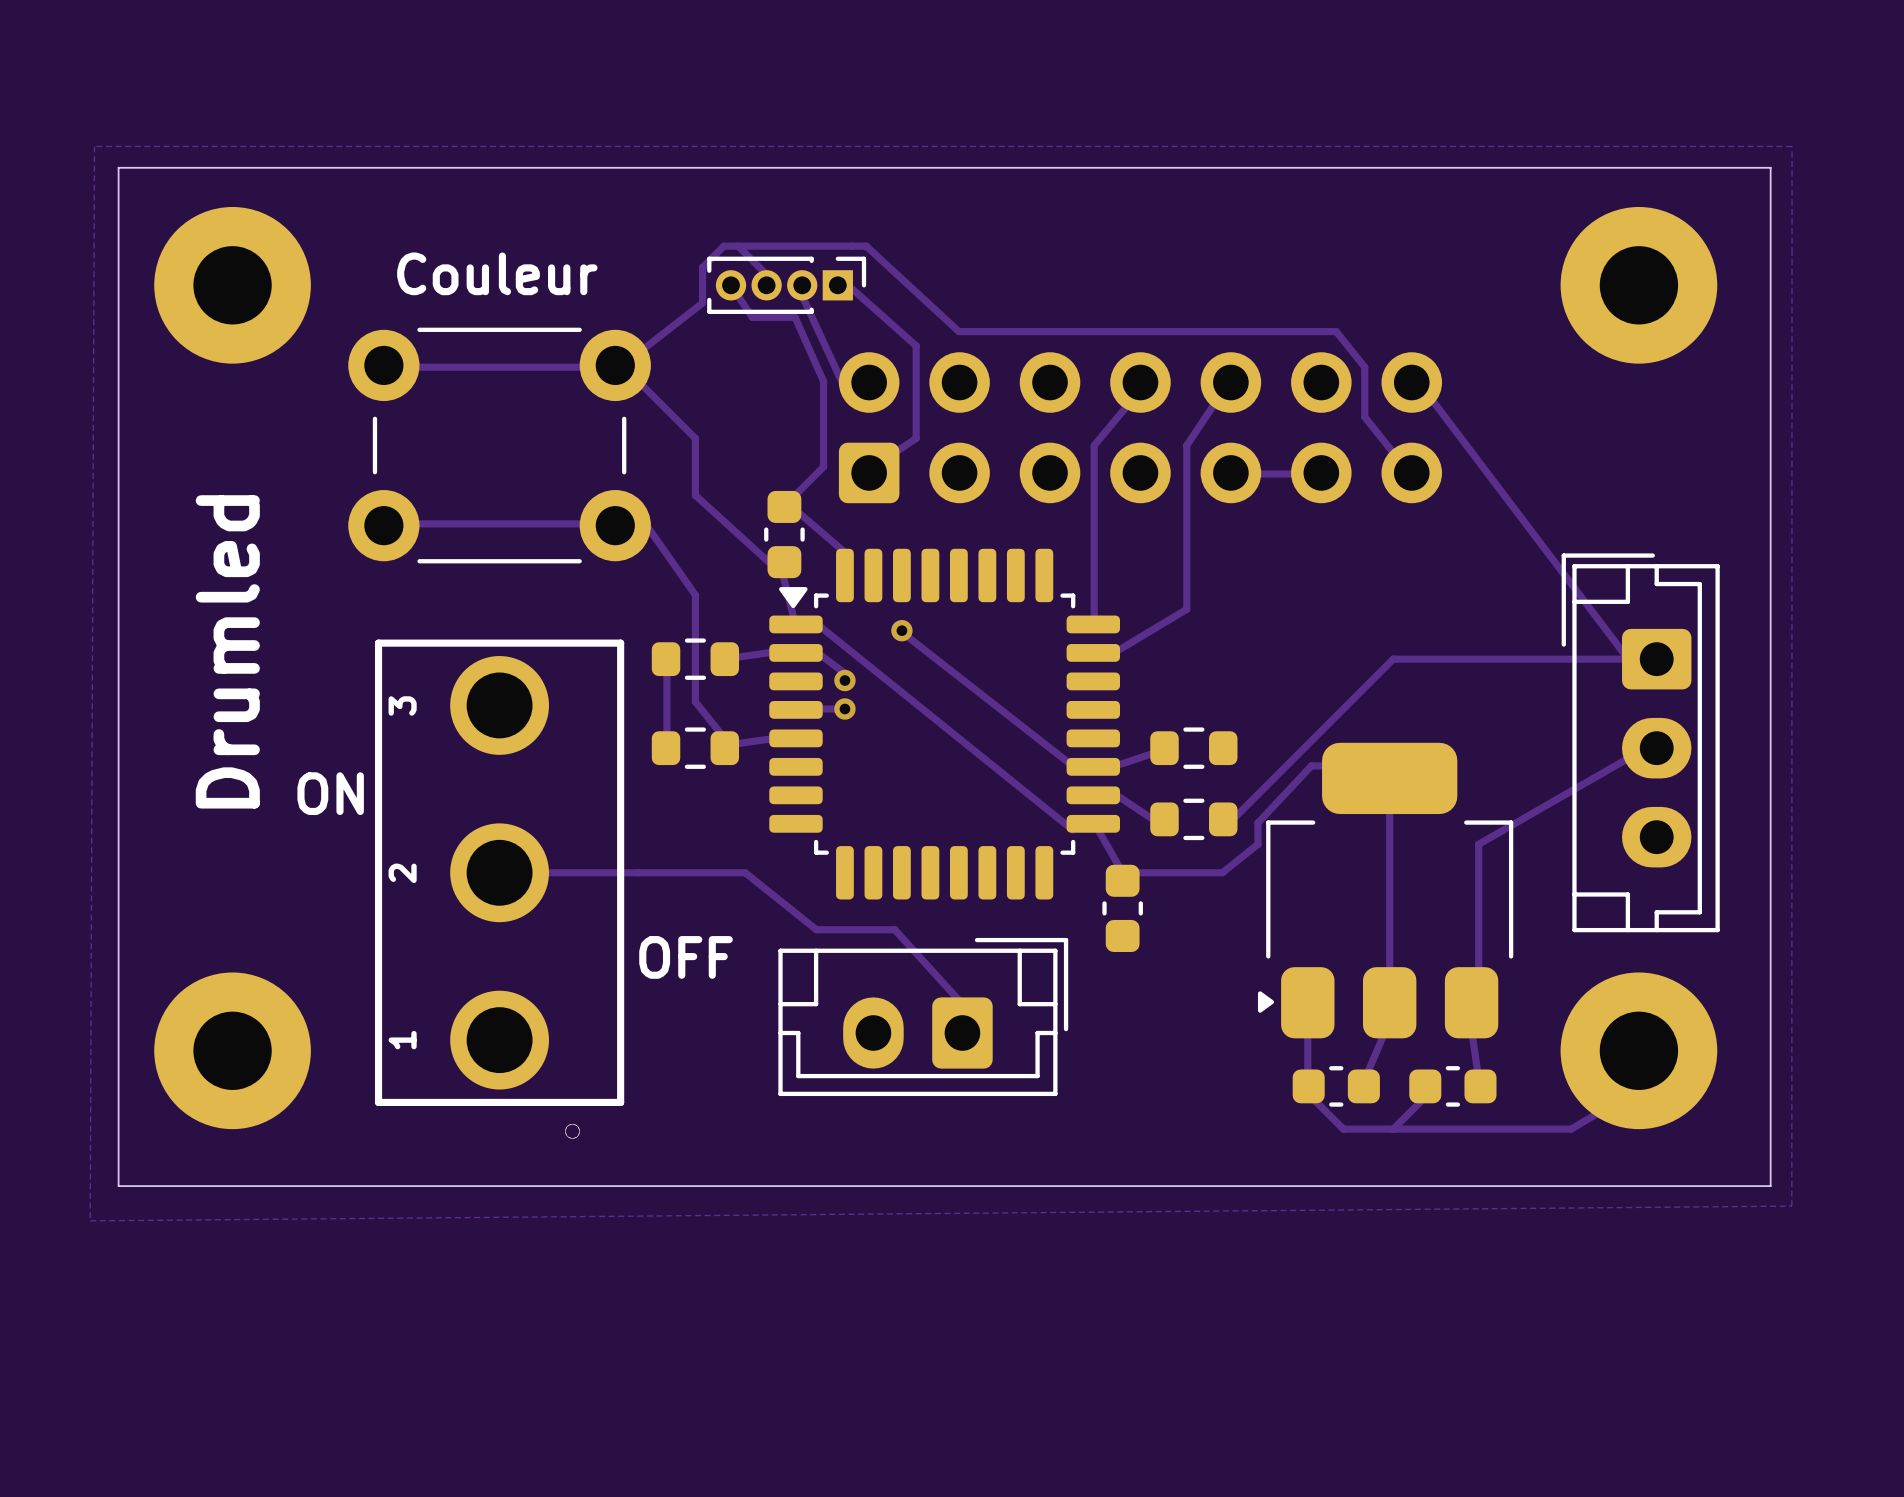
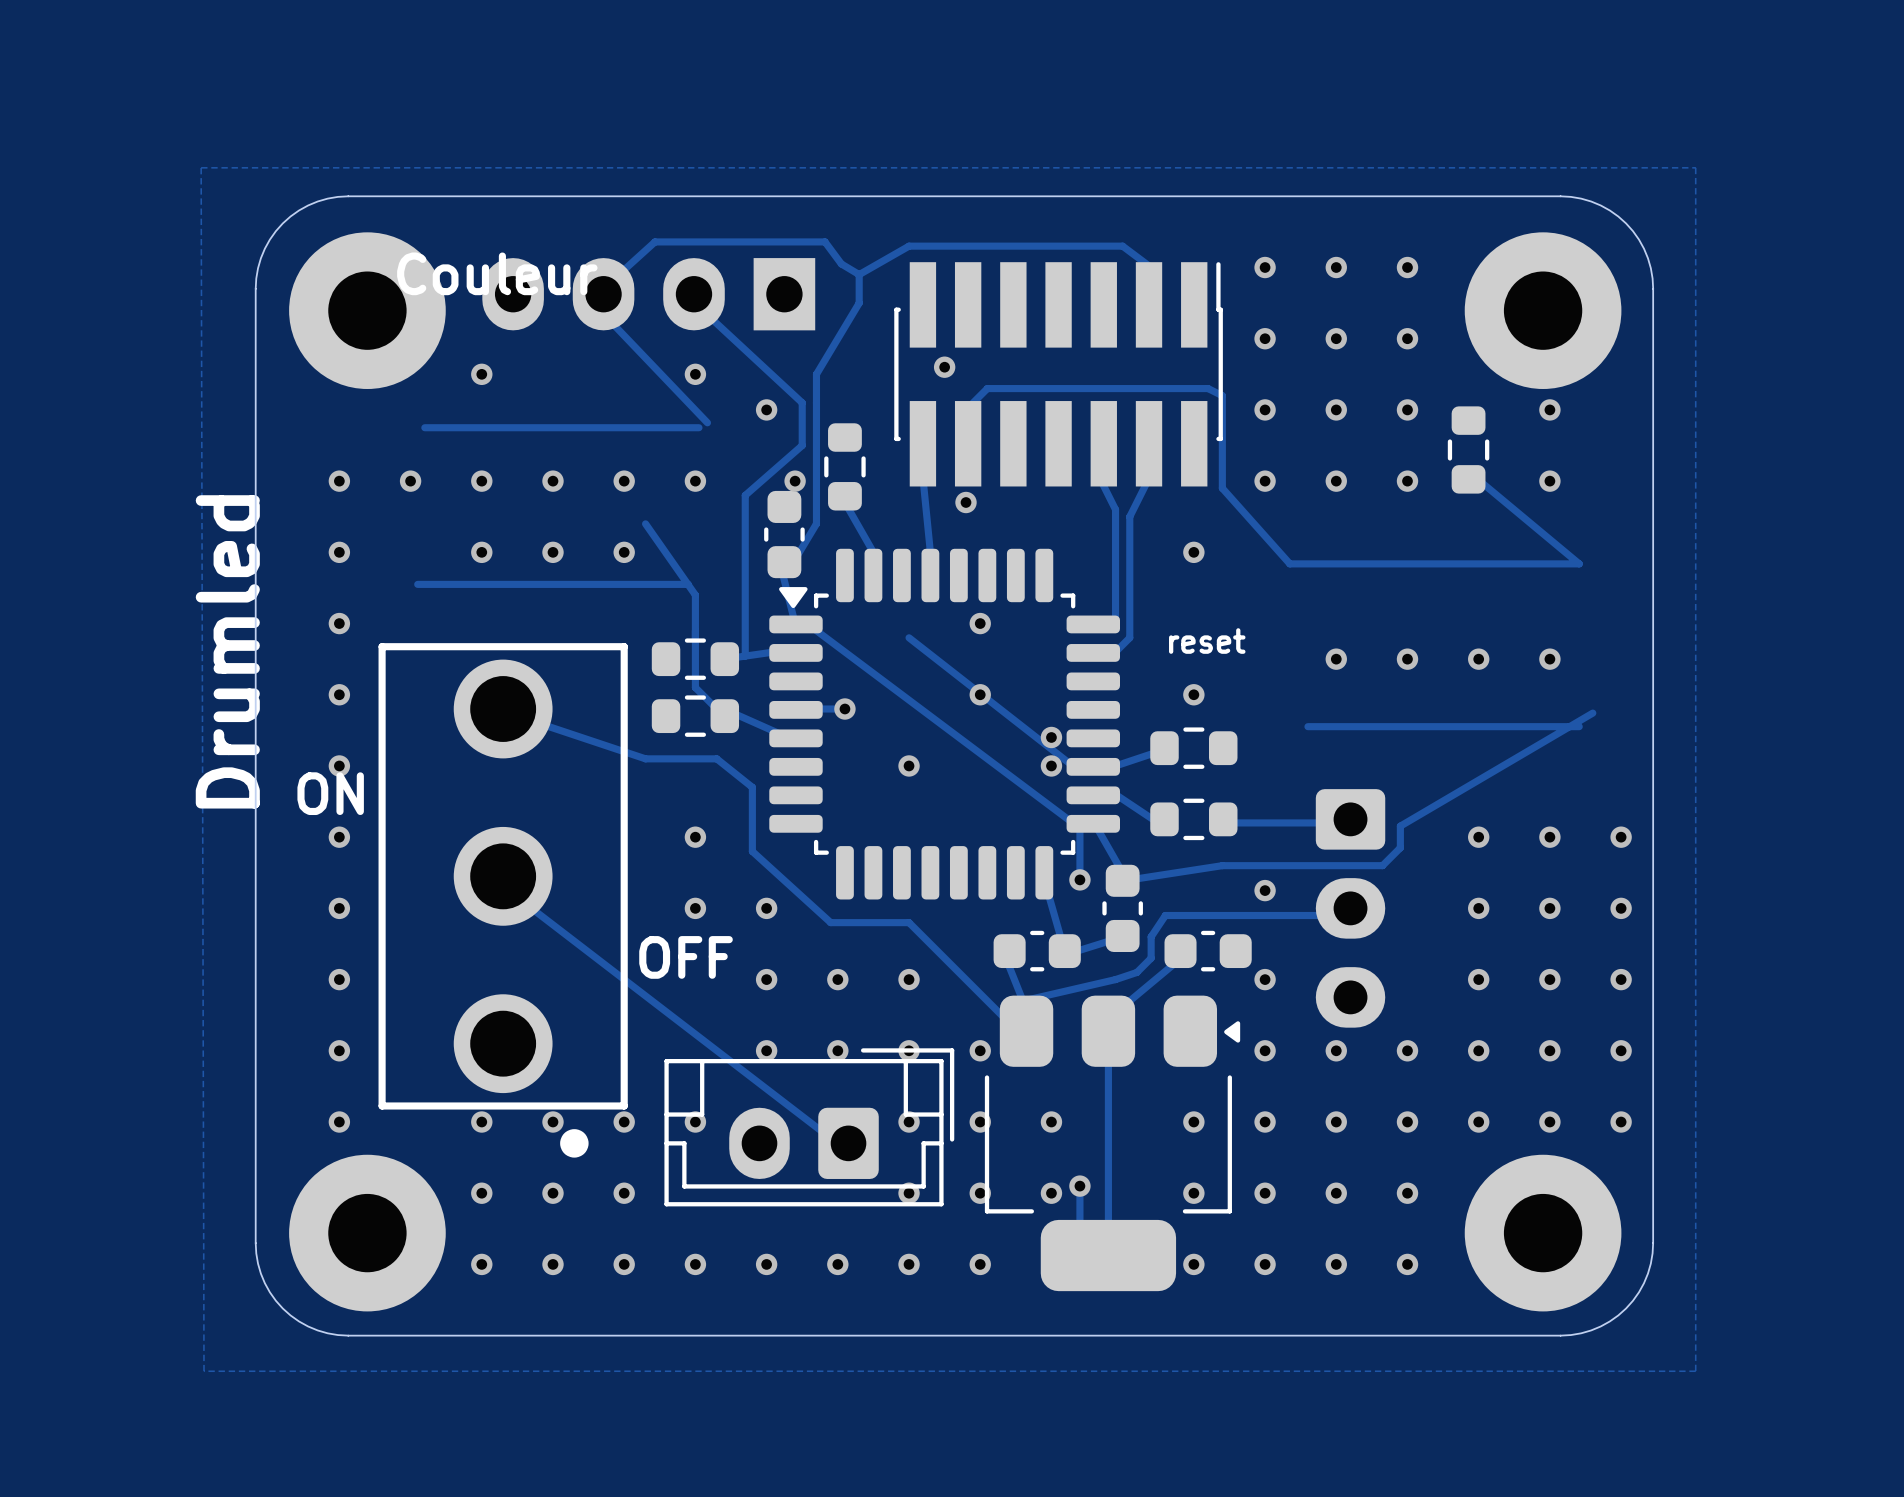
zone outline: (94, 146) (1792, 146) (1791, 1206) (90, 1220) (94, 146) -> (201, 167) (204, 1371) (1695, 1371) (1695, 167) (201, 167)
board edge: (118, 167) (1770, 167) (1770, 1186) (118, 1186) (118, 167) -> (348, 196) (327, 198) (308, 205) (282, 223) (269, 239) (260, 258) (255, 288) (255, 1243) (258, 1263) (264, 1283) (275, 1300) (290, 1315) (317, 1330) (348, 1335) (1560, 1335) (1581, 1333) (1600, 1326) (1618, 1315) (1632, 1300) (1647, 1273) (1653, 1243) (1653, 288) (1650, 268) (1644, 248) (1632, 231) (1618, 216) (1591, 201) (1560, 196) (348, 196)
track: (738, 246) (766, 274) -> none
track: none -> (1151, 267) (1122, 246) (909, 246) (859, 274)
via: none -> (1265, 267)
via: none -> (1336, 267)
via: none -> (1407, 267)
track: none -> (859, 274) (859, 303) (816, 374) (816, 523) (795, 559)
track: none -> (859, 274) (841, 263) (825, 241) (655, 241) (617, 276)
part position: (232, 285) -> (367, 310)
part: (786, 285) -> none
part position: (1638, 285) -> (1543, 310)
track: (852, 288) (916, 345) (916, 438) (894, 452) -> none
part: none -> (648, 294)
track: (738, 295) (752, 317) (795, 317) (823, 381) (823, 466) (795, 495) -> none
track: (802, 295) (844, 388) -> none
track: none -> (704, 312) (802, 402) (802, 445) (745, 495) (745, 656)
track: none -> (613, 324) (707, 422)
via: none -> (1265, 338)
via: none -> (1336, 338)
via: none -> (1407, 338)
track: (638, 352) (702, 303) (702, 267) (723, 246) (866, 246) (958, 331) (1336, 331) (1364, 367) (1364, 417) (1393, 452) -> none
track: (410, 367) (588, 367) -> none
via: none -> (944, 367)
via: none -> (481, 374)
via: none -> (695, 374)
part: none -> (1058, 374)
track: (638, 381) (695, 438) (695, 495) (773, 566) -> none
track: (1428, 395) (1628, 659) -> none
track: (1129, 402) (1094, 445) (1094, 623) -> none
track: (1215, 402) (1186, 445) (1186, 609) (1115, 652) -> (1151, 474) (1129, 516) (1129, 637) (1115, 652)
via: none -> (766, 409)
track: none -> (966, 409) (987, 388) (1208, 388) (1222, 395) (1222, 488) (1289, 563) (1579, 563) (1470, 473)
via: none -> (1265, 409)
via: none -> (1336, 409)
via: none -> (1407, 409)
via: none -> (1549, 409)
track: none -> (424, 427) (698, 427)
part: (1140, 427) -> none
part: (499, 445) -> none
part: none -> (1468, 449)
part: none -> (844, 466)
track: (1257, 474) (1293, 474) -> none
via: none -> (339, 481)
via: none -> (410, 481)
via: none -> (481, 481)
via: none -> (552, 481)
via: none -> (624, 481)
via: none -> (695, 481)
via: none -> (795, 481)
track: none -> (923, 481) (930, 552)
track: none -> (1101, 481) (1115, 509) (1115, 616)
via: none -> (1265, 481)
via: none -> (1336, 481)
via: none -> (1407, 481)
via: none -> (1549, 481)
track: none -> (844, 502) (873, 552)
via: none -> (966, 502)
track: (795, 509) (844, 552) -> none
track: (410, 523) (588, 523) -> none
via: none -> (339, 552)
via: none -> (481, 552)
via: none -> (552, 552)
via: none -> (624, 552)
via: none -> (1193, 552)
track: none -> (417, 584) (688, 584)
via: none -> (339, 623)
track: (816, 623) (1072, 830) -> none
via: none -> (980, 623)
track: none -> (816, 630) (1072, 822)
via: (901, 630) -> none
part footprint: [374, 639, 625, 1139] -> [378, 643, 628, 1158]
text: none -> reset (1207, 641)
track: (816, 652) (844, 673) -> none
via: none -> (1336, 659)
via: none -> (1407, 659)
via: none -> (1478, 659)
via: none -> (1549, 659)
track: (1635, 659) (1393, 659) (1229, 822) -> (1329, 822) (1229, 822)
track: (666, 673) (666, 737) -> none
via: (844, 680) -> none
track: (695, 687) (695, 701) (723, 737) -> (695, 687) (716, 709)
via: none -> (339, 694)
via: none -> (980, 694)
via: none -> (1193, 694)
track: none -> (723, 709) (787, 737)
track: none -> (1592, 713) (1400, 826) (1400, 847) (1382, 865) (1222, 865) (1129, 879)
track: none -> (538, 723) (645, 758) (716, 758) (752, 787) (752, 851) (830, 922) (909, 922) (1008, 1022)
track: none -> (1307, 726) (1579, 726)
track: (780, 737) (731, 744) -> none
via: none -> (1051, 737)
part: (1640, 742) -> none
part position: (695, 748) -> (695, 716)
track: (1646, 748) (1478, 844) (1478, 993) -> none
via: none -> (339, 765)
via: none -> (909, 765)
via: none -> (1051, 765)
track: (1329, 765) (1311, 765) (1257, 822) (1257, 844) (1222, 872) (1136, 872) -> none
track: (1389, 787) (1389, 979) -> none
track: none -> (1079, 822) (1079, 879)
via: none -> (339, 837)
via: none -> (695, 837)
via: none -> (1478, 837)
via: none -> (1549, 837)
via: none -> (1621, 837)
track: (545, 872) (745, 872) (816, 929) (894, 929) (966, 1008) -> none
track: none -> (1044, 879) (1065, 954) (1122, 936)
via: none -> (1079, 879)
via: none -> (1265, 890)
part rotation: 0° (1385, 890) -> 180° (1112, 1143)
part position: (1385, 890) -> (1112, 1143)
via: none -> (339, 908)
track: none -> (531, 908) (823, 1132)
via: none -> (695, 908)
via: none -> (766, 908)
part: none -> (1350, 908)
via: none -> (1478, 908)
via: none -> (1549, 908)
via: none -> (1621, 908)
track: none -> (1329, 915) (1165, 915) (1151, 936) (1151, 958) (1136, 972) (1115, 979) (1022, 1000) (1008, 965)
part: none -> (1037, 951)
part: none -> (1208, 951)
track: none -> (1172, 965) (1129, 1000)
via: none -> (339, 979)
via: none -> (766, 979)
via: none -> (837, 979)
via: none -> (909, 979)
via: none -> (1265, 979)
via: none -> (1478, 979)
via: none -> (1549, 979)
via: none -> (1621, 979)
part position: (923, 1016) -> (809, 1127)
track: (1307, 1022) (1307, 1093) (1343, 1129) (1571, 1129) (1606, 1107) -> none
track: (1386, 1029) (1364, 1079) -> none
track: (1471, 1029) (1478, 1079) -> none
track: none -> (1108, 1036) (1108, 1250)
part position: (232, 1050) -> (367, 1233)
via: none -> (339, 1050)
via: none -> (766, 1050)
via: none -> (837, 1050)
via: none -> (909, 1050)
via: none -> (980, 1050)
via: none -> (1265, 1050)
via: none -> (1336, 1050)
via: none -> (1407, 1050)
via: none -> (1478, 1050)
via: none -> (1549, 1050)
via: none -> (1621, 1050)
part position: (1638, 1050) -> (1543, 1233)
part: (1336, 1086) -> none
part: (1452, 1086) -> none
track: (1421, 1100) (1393, 1129) -> none
via: none -> (339, 1122)
via: none -> (481, 1122)
via: none -> (552, 1122)
via: none -> (624, 1122)
via: none -> (695, 1122)
via: none -> (909, 1122)
via: none -> (980, 1122)
via: none -> (1051, 1122)
via: none -> (1193, 1122)
via: none -> (1265, 1122)
via: none -> (1336, 1122)
via: none -> (1407, 1122)
via: none -> (1478, 1122)
via: none -> (1549, 1122)
via: none -> (1621, 1122)
track: none -> (1079, 1186) (1079, 1228)
via: none -> (1079, 1186)
via: none -> (481, 1193)
via: none -> (552, 1193)
via: none -> (624, 1193)
via: none -> (909, 1193)
via: none -> (980, 1193)
via: none -> (1051, 1193)
via: none -> (1193, 1193)
via: none -> (1265, 1193)
via: none -> (1336, 1193)
via: none -> (1407, 1193)
via: none -> (481, 1264)
via: none -> (552, 1264)
via: none -> (624, 1264)
via: none -> (695, 1264)
via: none -> (766, 1264)
via: none -> (837, 1264)
via: none -> (909, 1264)
via: none -> (980, 1264)
via: none -> (1193, 1264)
via: none -> (1265, 1264)
via: none -> (1336, 1264)
via: none -> (1407, 1264)

